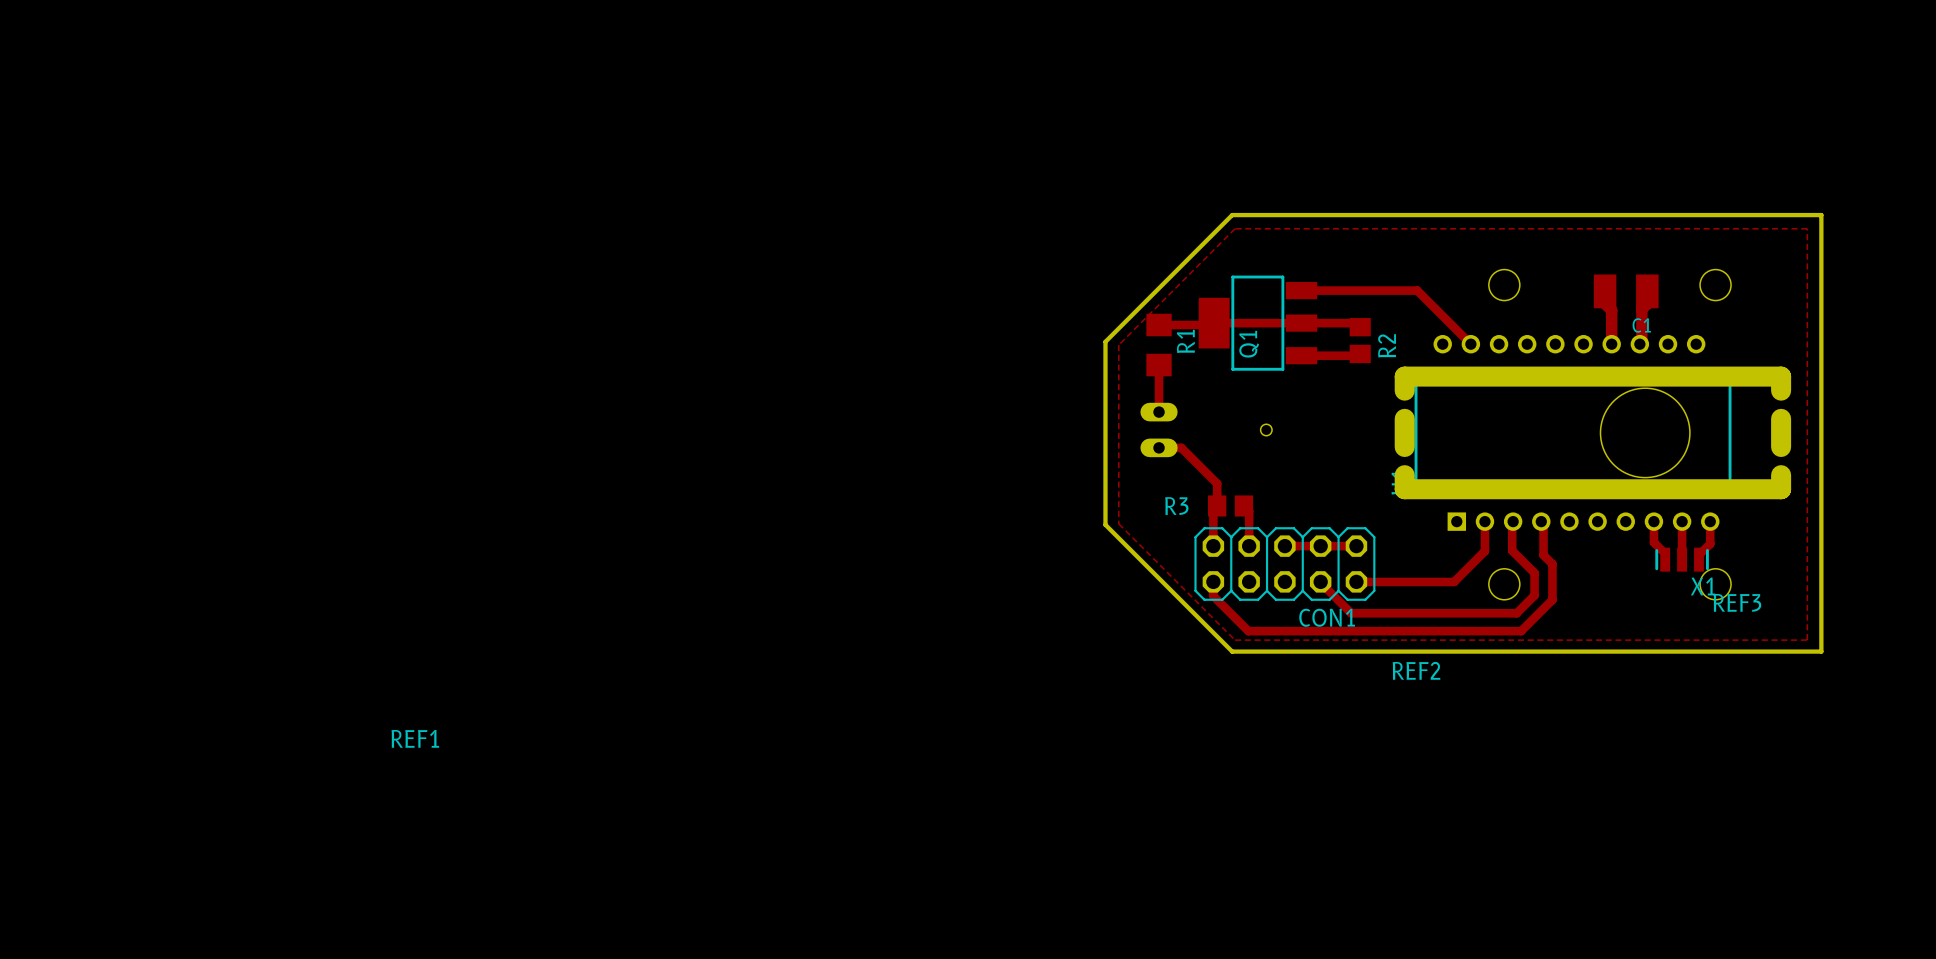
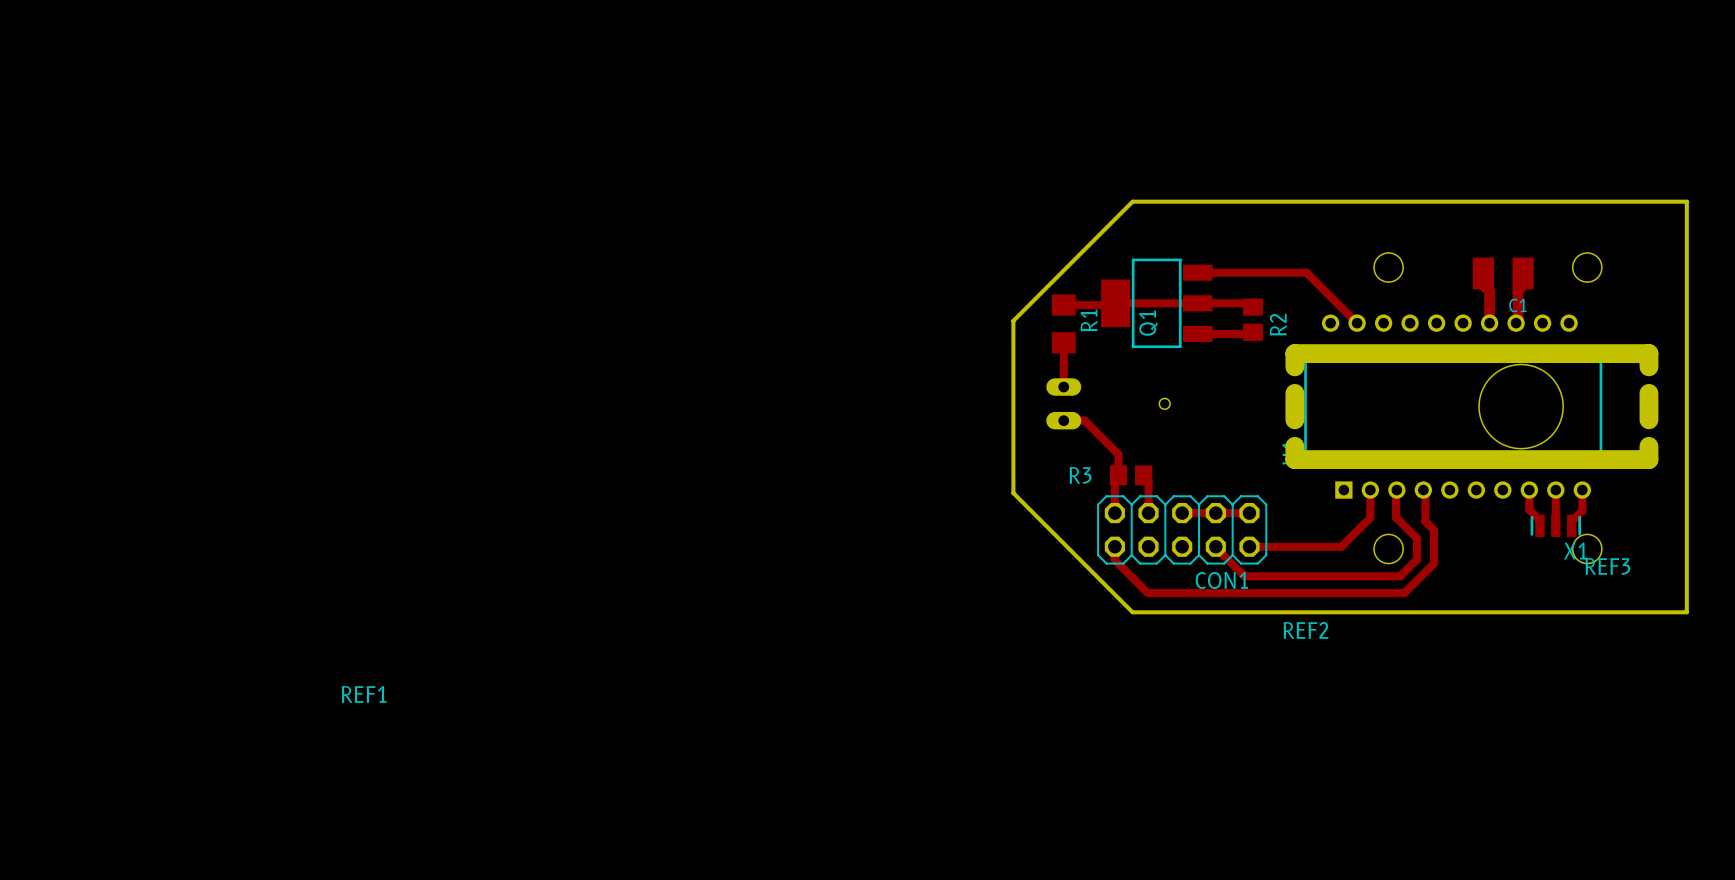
top zone outline: (1235, 228) (1807, 228) (1807, 640) (1235, 640) (1118, 523) (1118, 345) (1235, 228) -> none

